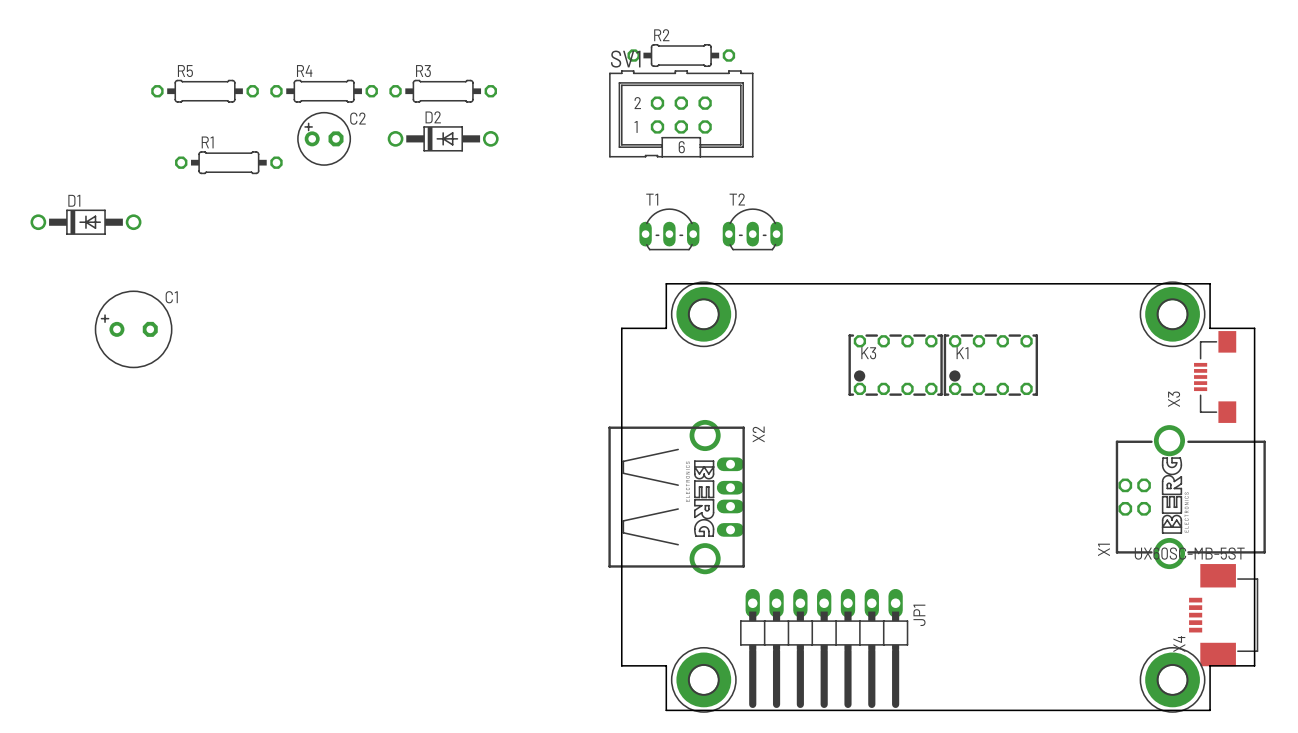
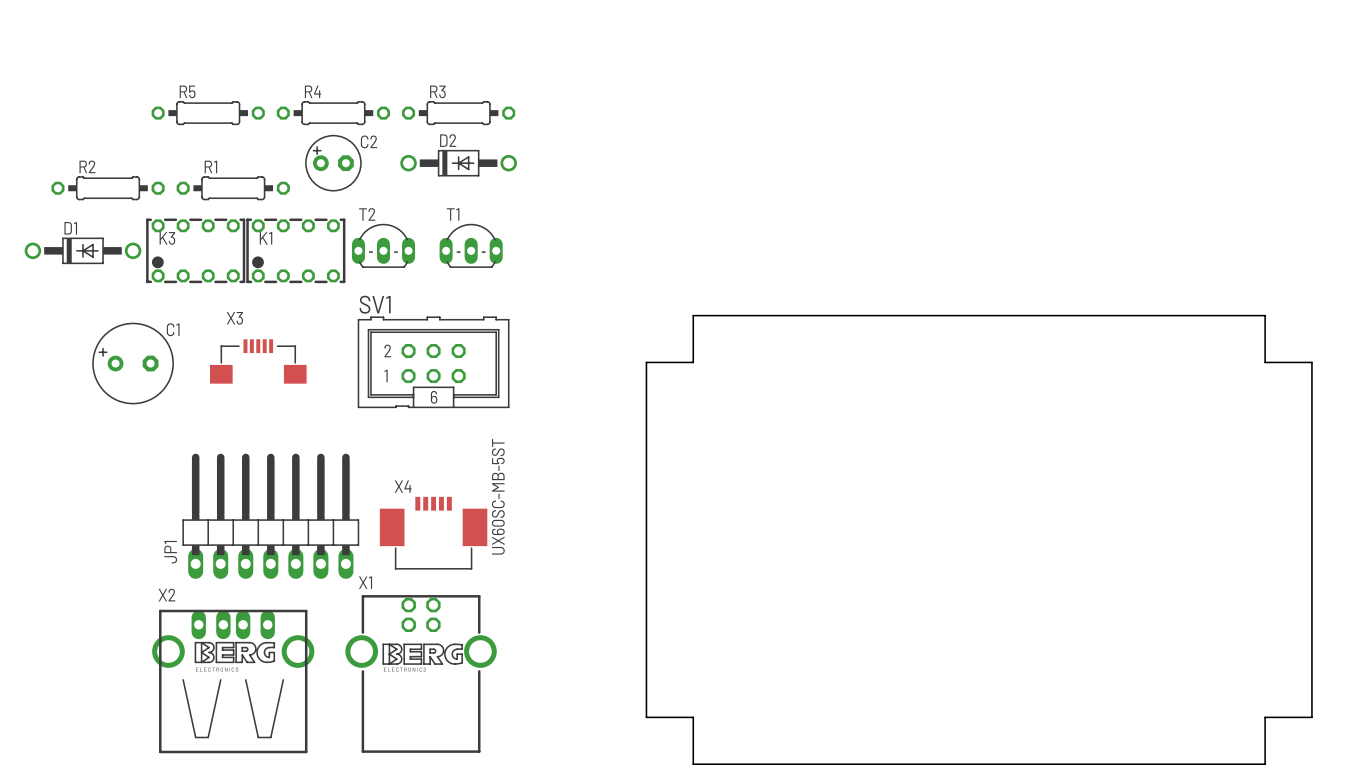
R2 position: (681, 55) -> (108, 188)
SV1 position: (681, 113) -> (433, 362)
T1 position: (669, 229) -> (471, 245)
T2 position: (752, 229) -> (383, 245)
part: (703, 314) -> none
part: (1172, 314) -> none
K3 position: (895, 365) -> (195, 250)
K1 position: (990, 365) -> (295, 250)
X3 rotation: 0° (1215, 376) -> 90° clockwise (258, 361)
X3 position: (1215, 376) -> (258, 361)
X2 footprint: [608, 419, 745, 575] -> [152, 609, 315, 754]
X2 name position: X2 (758, 434) -> X2 (167, 595)
X1 rotation: 0° (1190, 497) -> 90° clockwise (421, 673)
X1 position: (1190, 497) -> (421, 673)
X4 rotation: 0° (1223, 615) -> 90° clockwise (433, 533)
X4 position: (1223, 615) -> (433, 533)
JP1 rotation: 0° (824, 648) -> 180° (270, 516)
JP1 position: (824, 648) -> (270, 516)
part: (703, 679) -> none
part: (1172, 679) -> none

